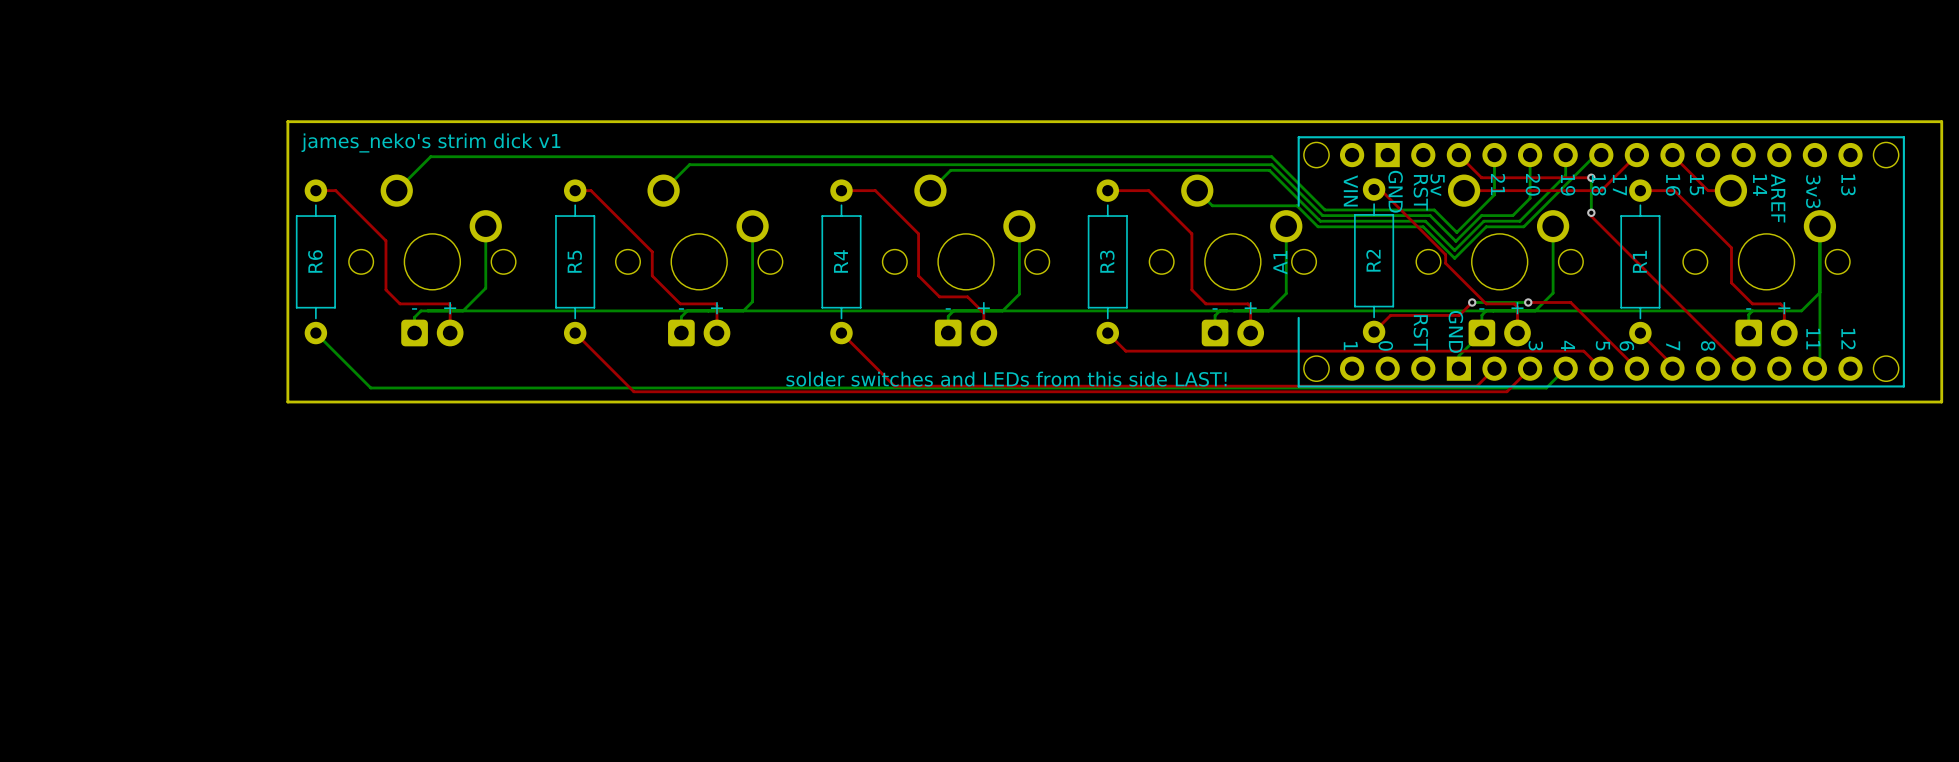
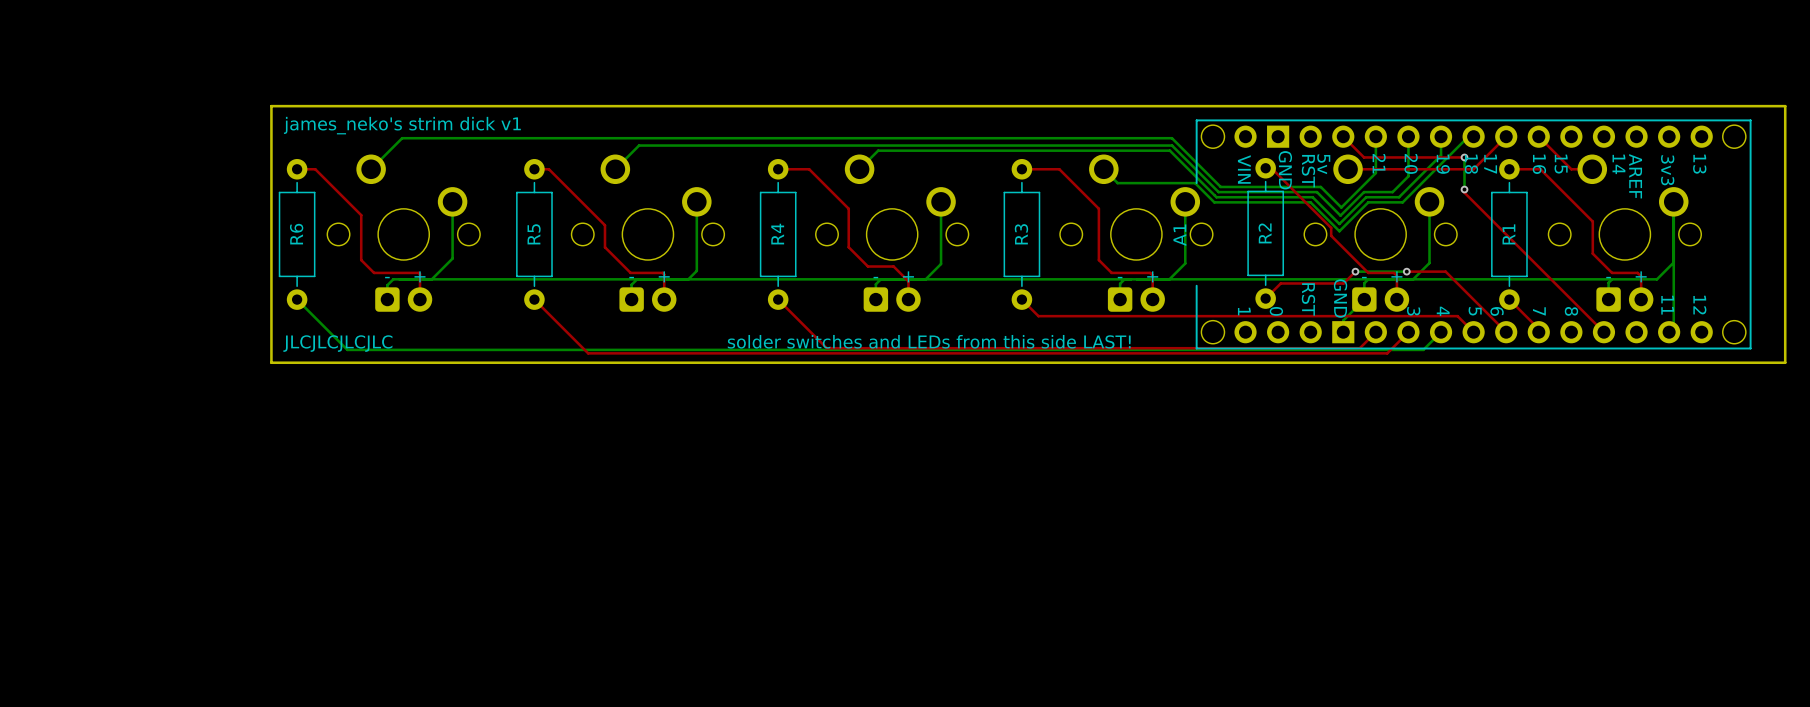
text: none -> JLCJLCJLCJLC (337, 343)

